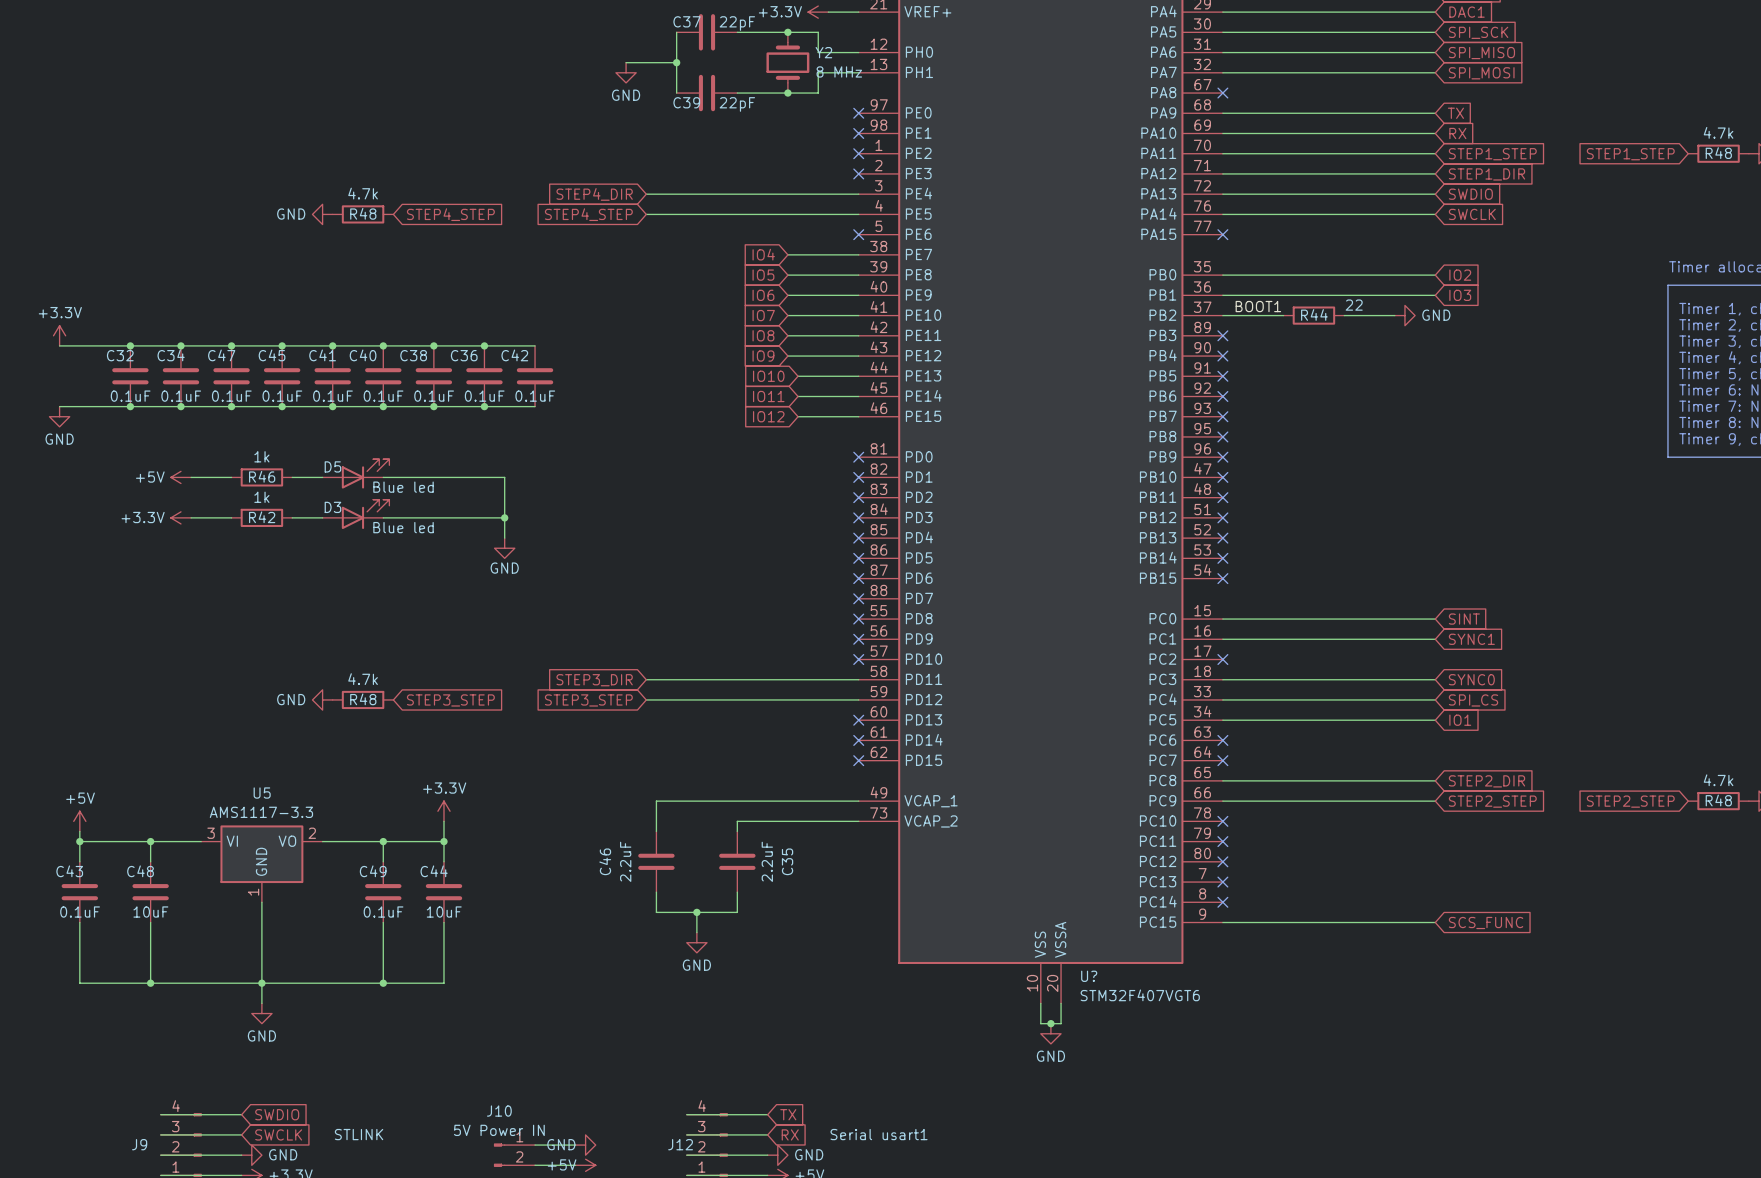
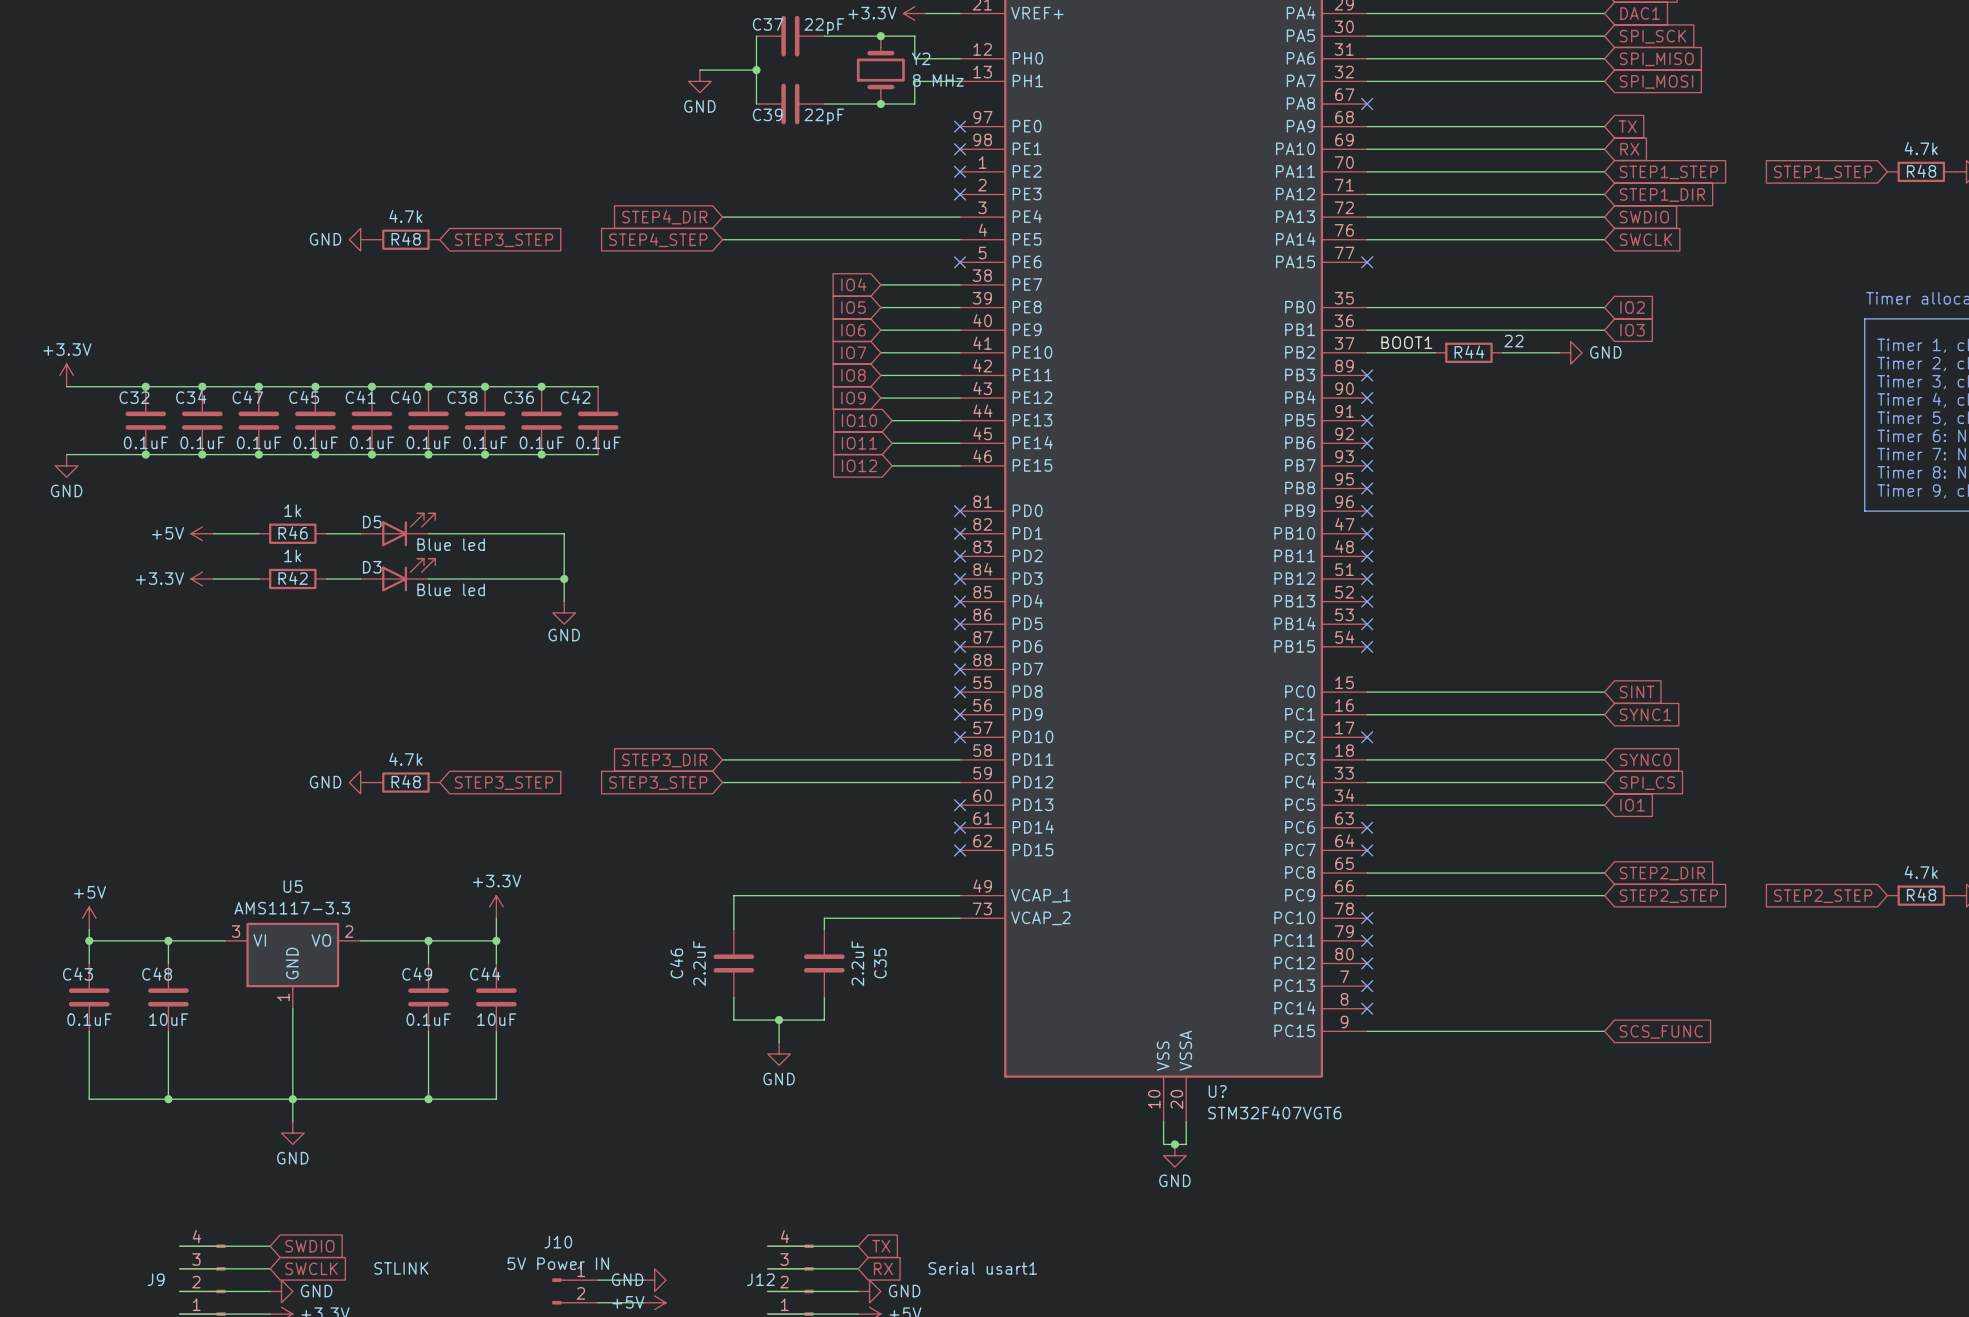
global label: STEP4_STEP (450, 214) -> STEP3_STEP (504, 240)

